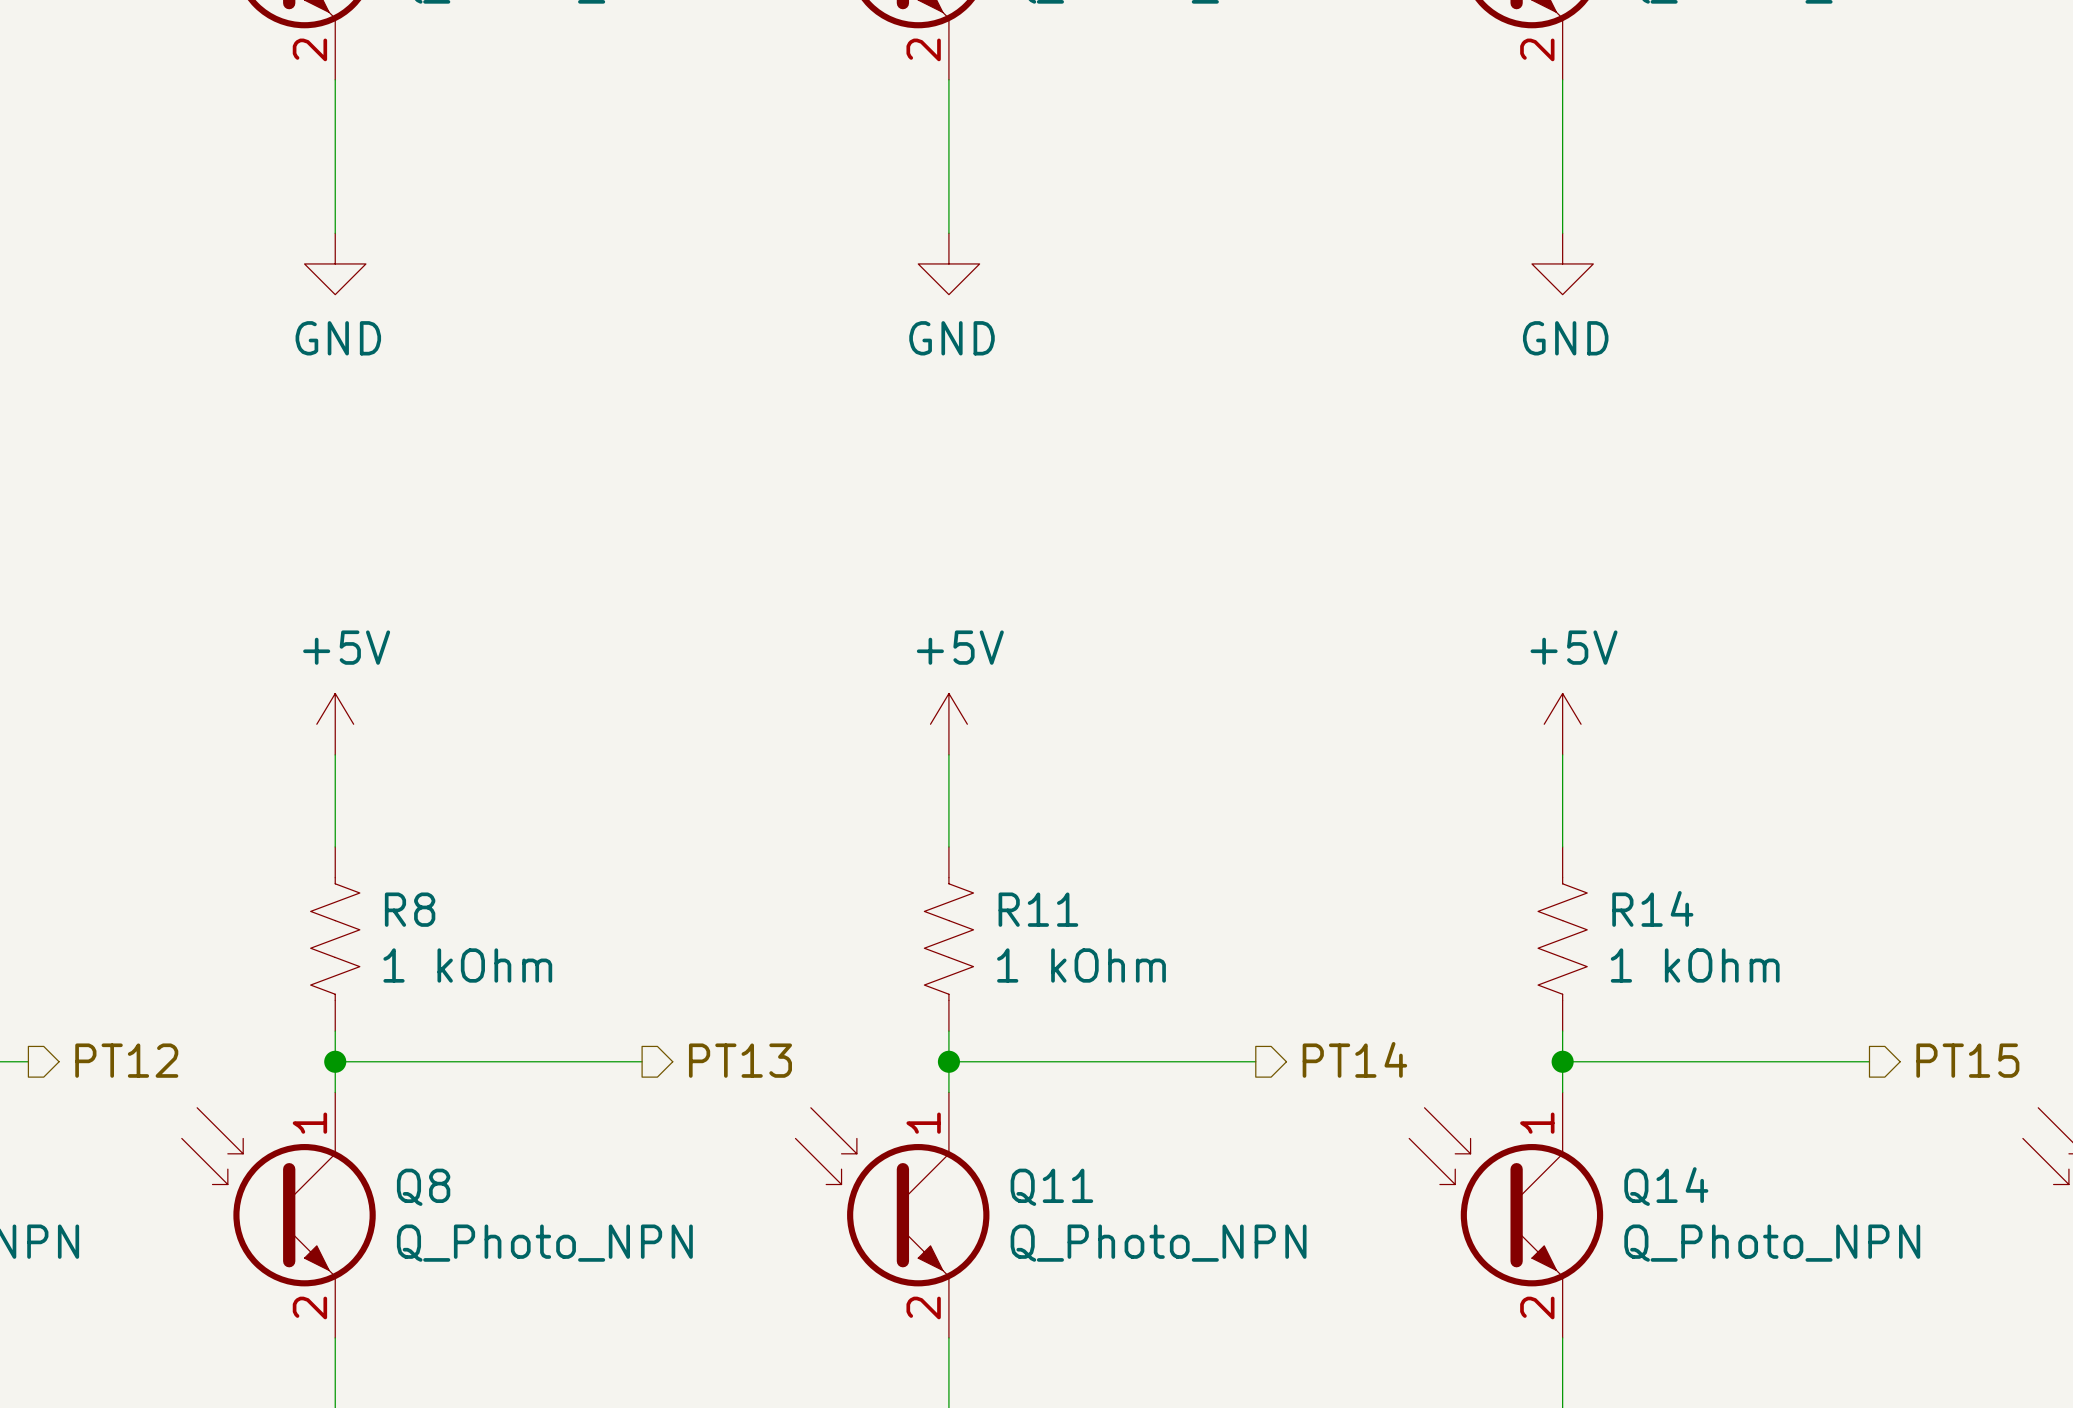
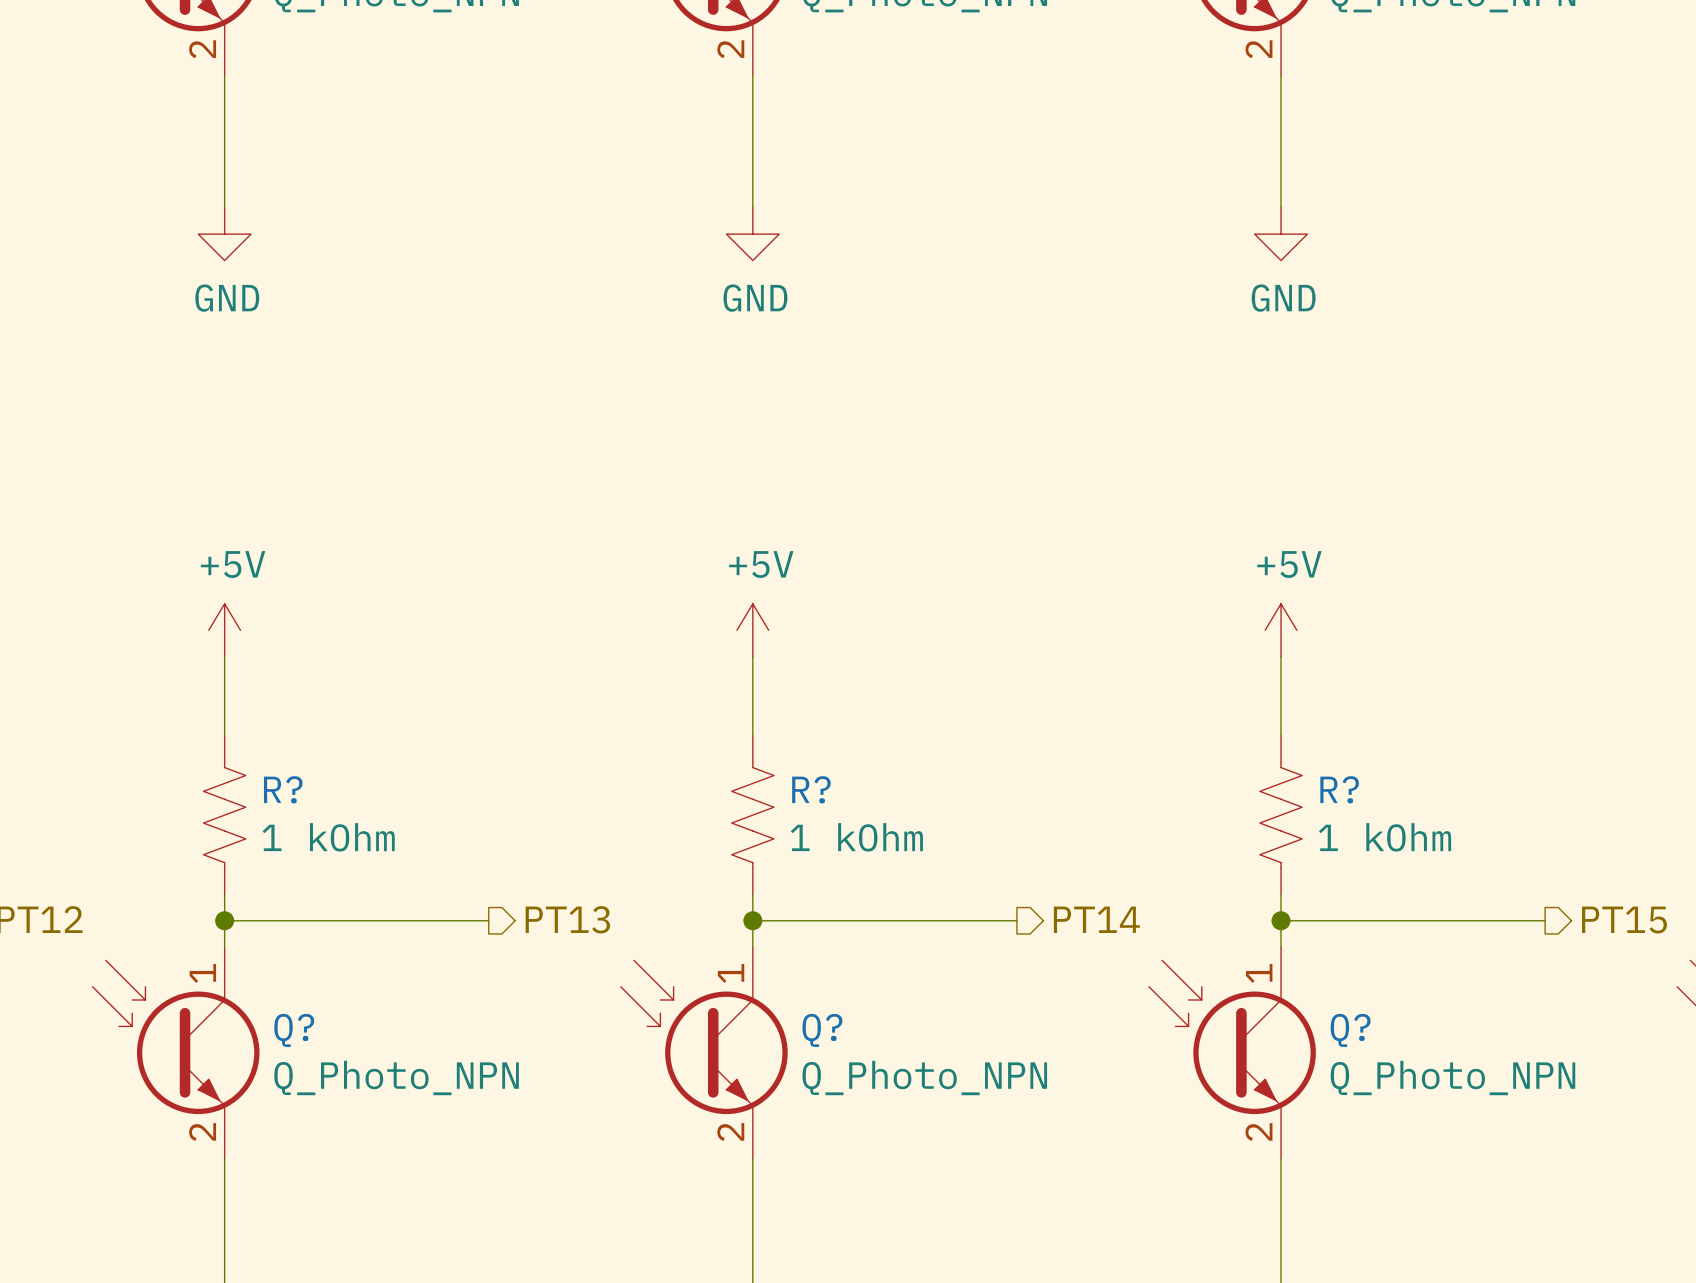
R14 name: R14 (1652, 908) -> R? (1339, 789)
R8 name: R8 (410, 909) -> R? (283, 789)
R11 name: R11 (1038, 909) -> R? (811, 789)
Q14 name: Q14 (1666, 1186) -> Q? (1350, 1030)
Q8 name: Q8 (423, 1187) -> Q? (294, 1030)
Q11 name: Q11 (1051, 1187) -> Q? (822, 1030)

